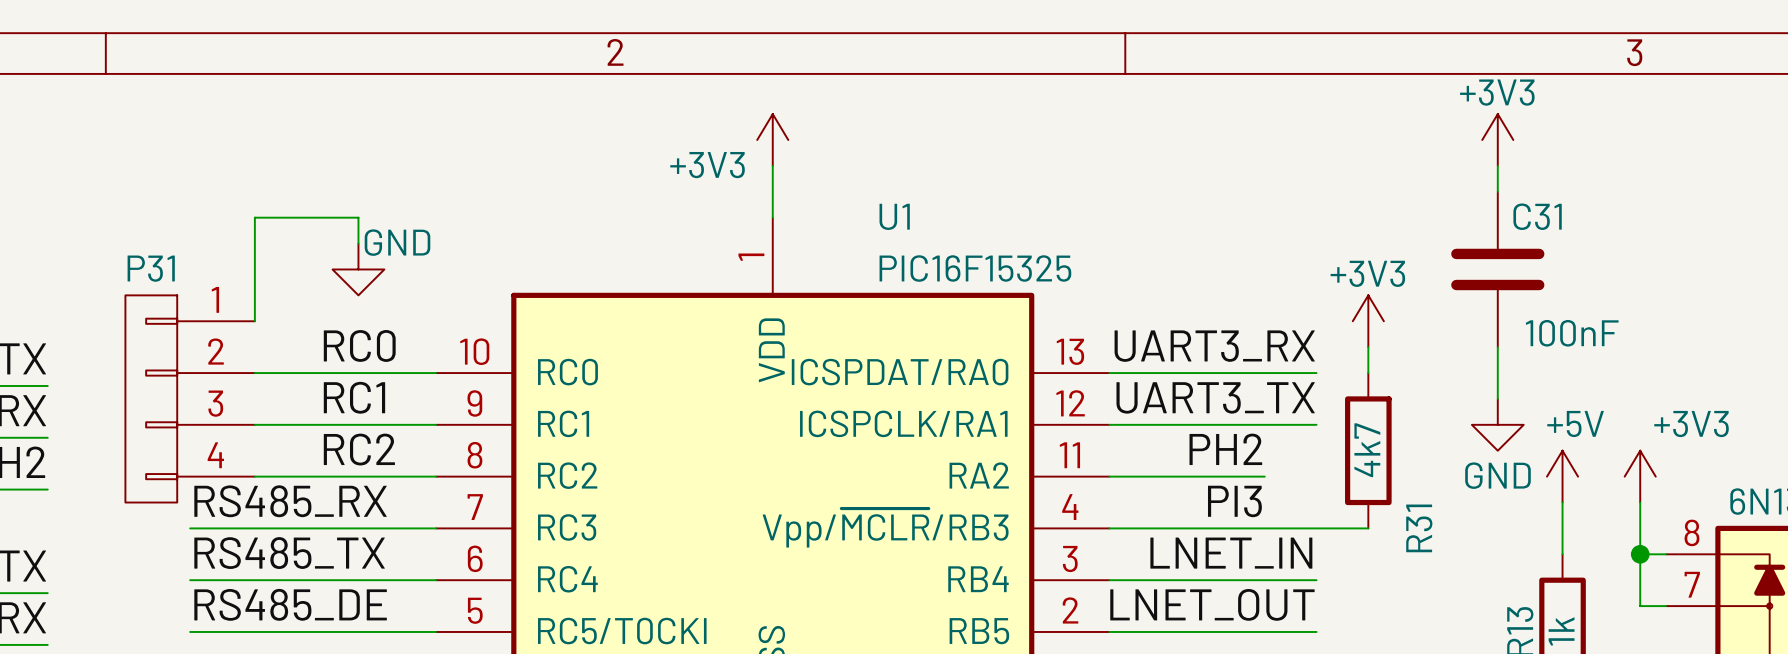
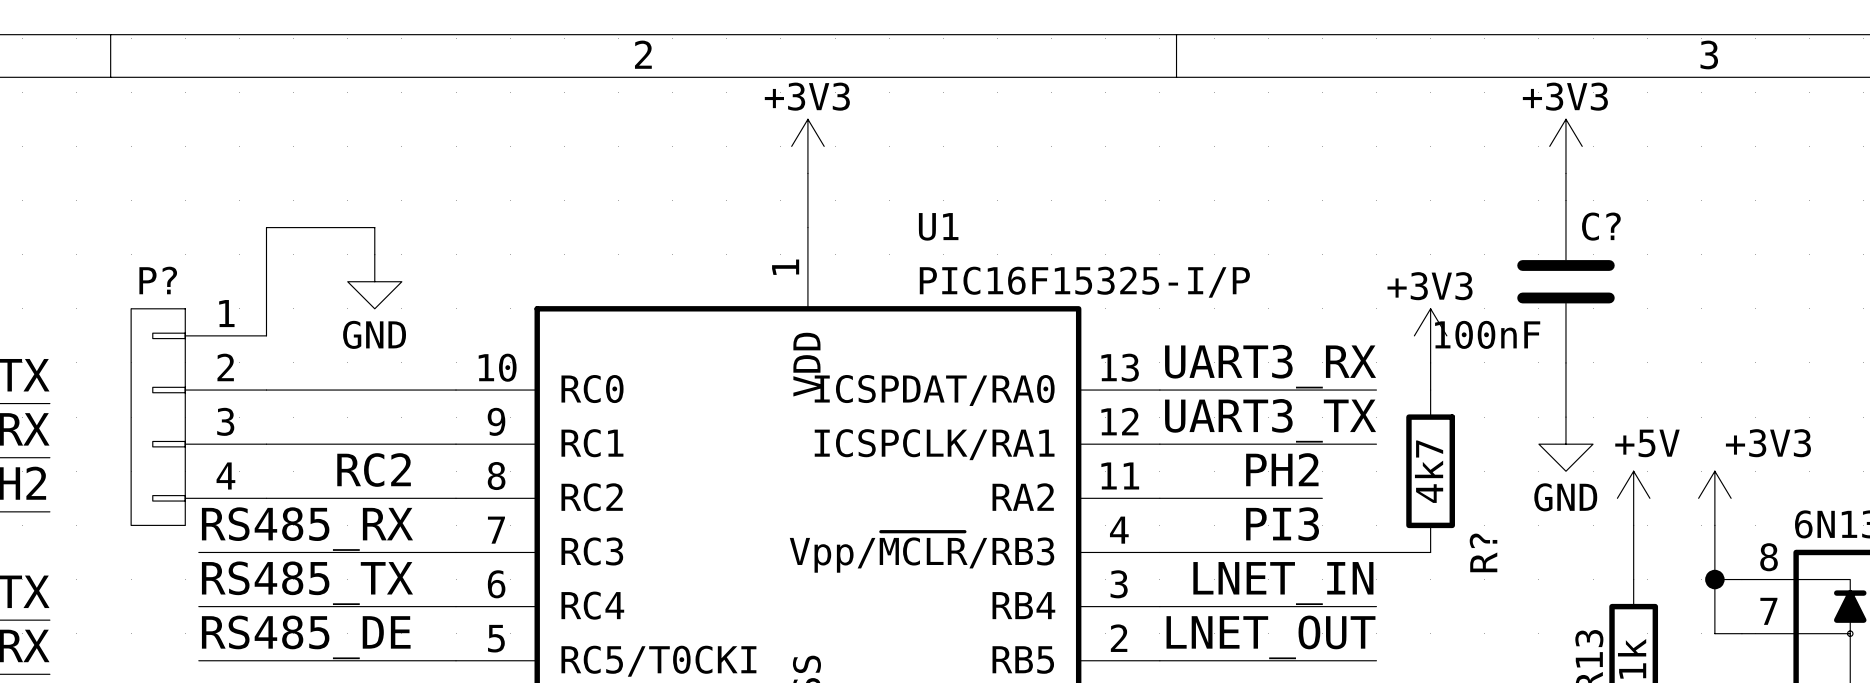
power symbol text position: +3V3 (707, 165) -> +3V3 (807, 96)
C31 name: C31 (1537, 216) -> C? (1601, 226)
power symbol text position: GND (397, 242) -> GND (374, 334)
P31 name: P31 (151, 268) -> P? (158, 280)
U1 value: PIC16F15325 (975, 268) -> PIC16F15325-I/P (1084, 282)
C31 value position: 100nF (1572, 333) -> 100nF (1487, 334)
label: RC0 (359, 345) -> none
label: RC1 (354, 397) -> none
R31 name: R31 (1419, 528) -> R? (1483, 552)

